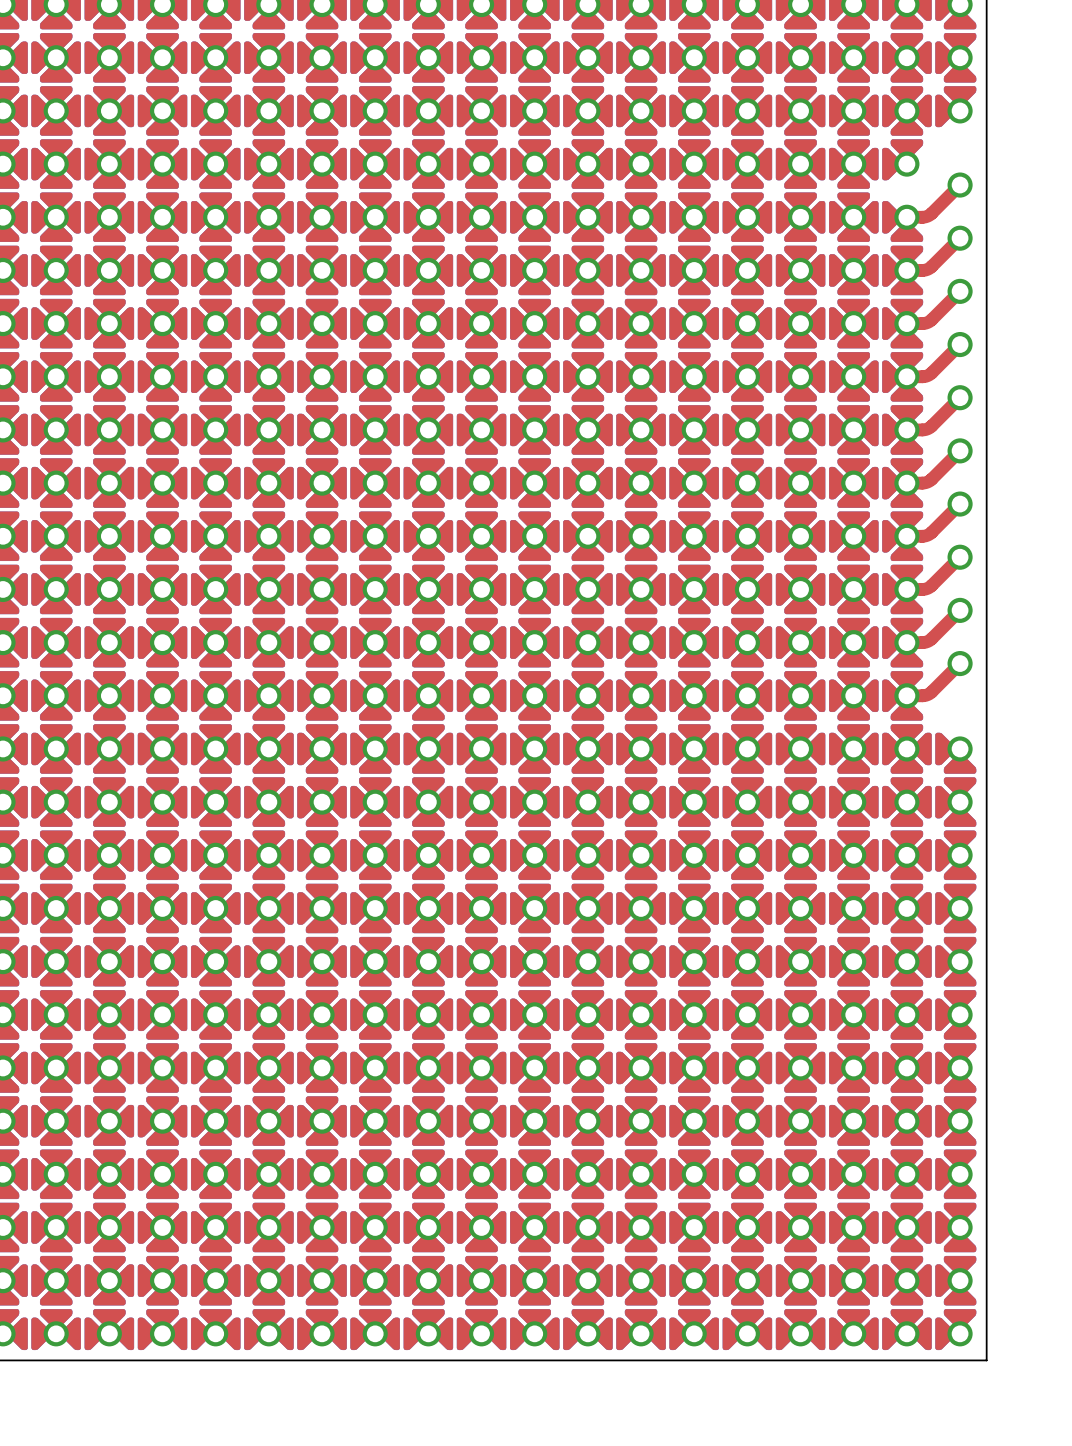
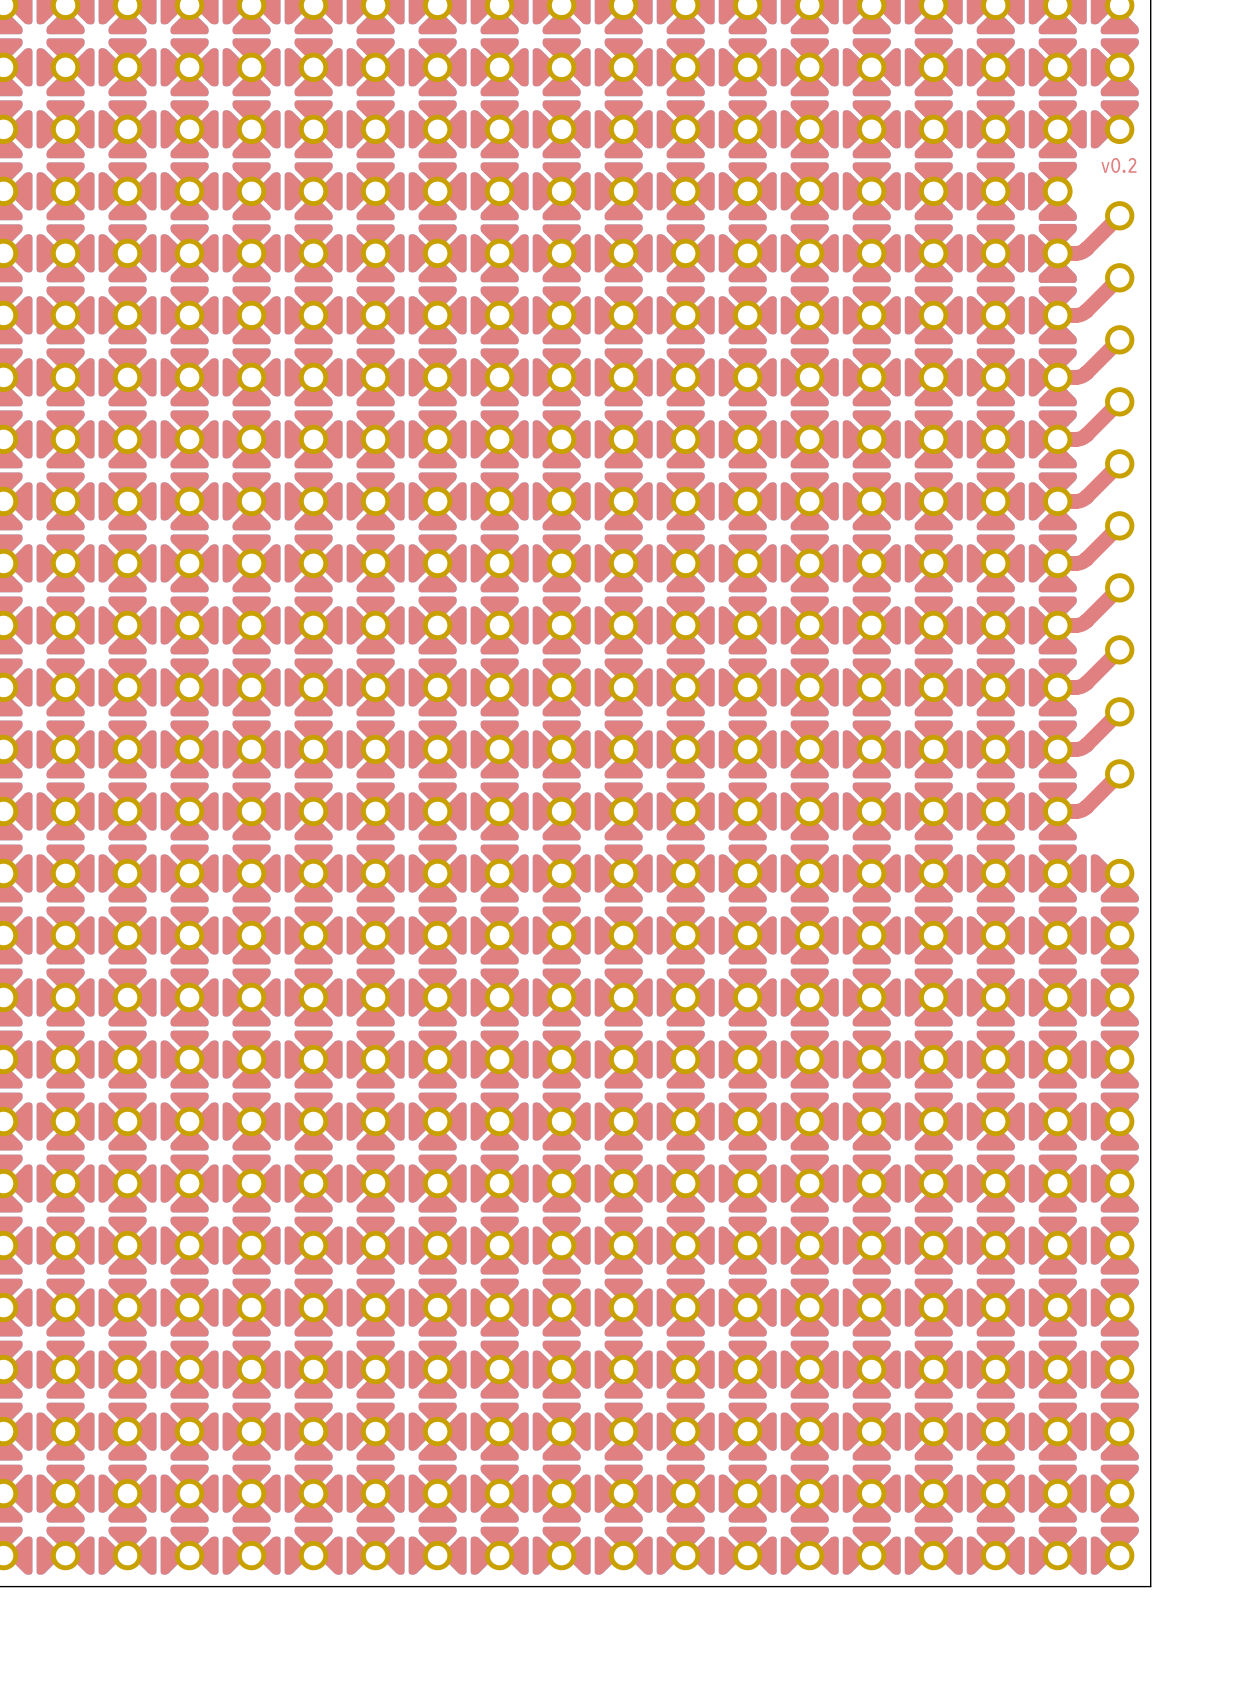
part footprint: [882, 139, 924, 181] -> [1028, 161, 1077, 221]
text: none -> v0.2 (1118, 165)
part footprint: [882, 201, 924, 242] -> [1028, 223, 1077, 283]

